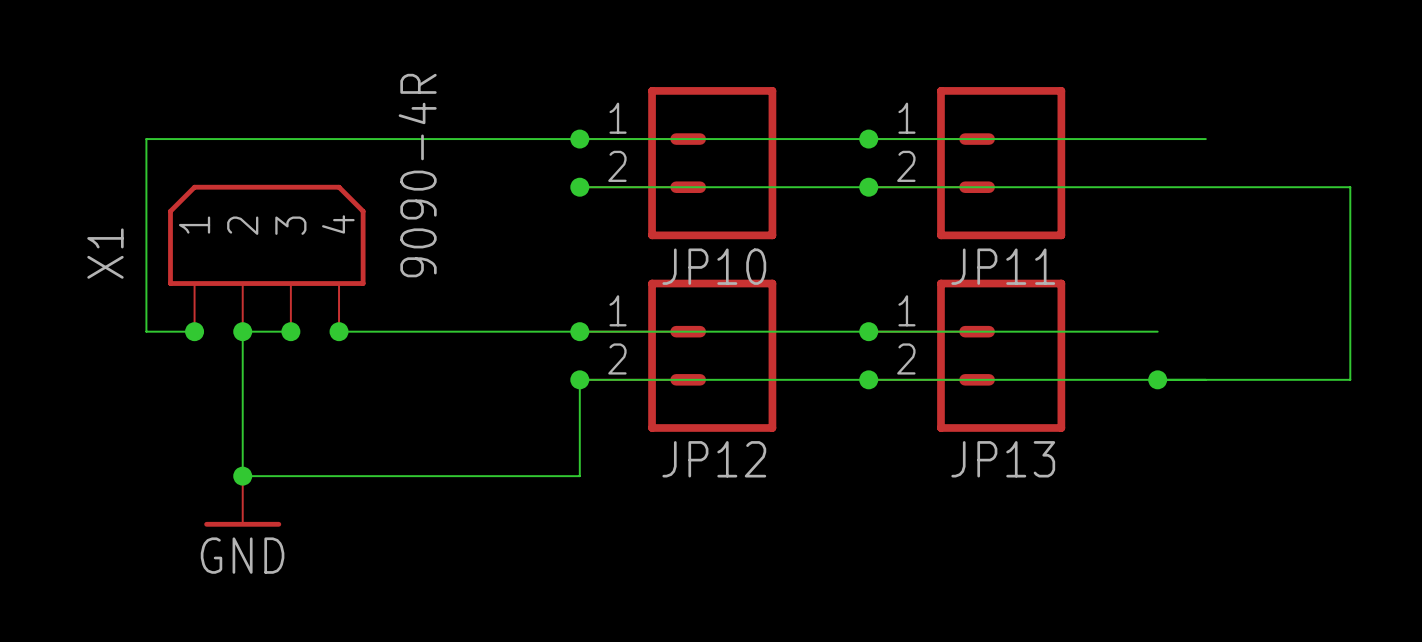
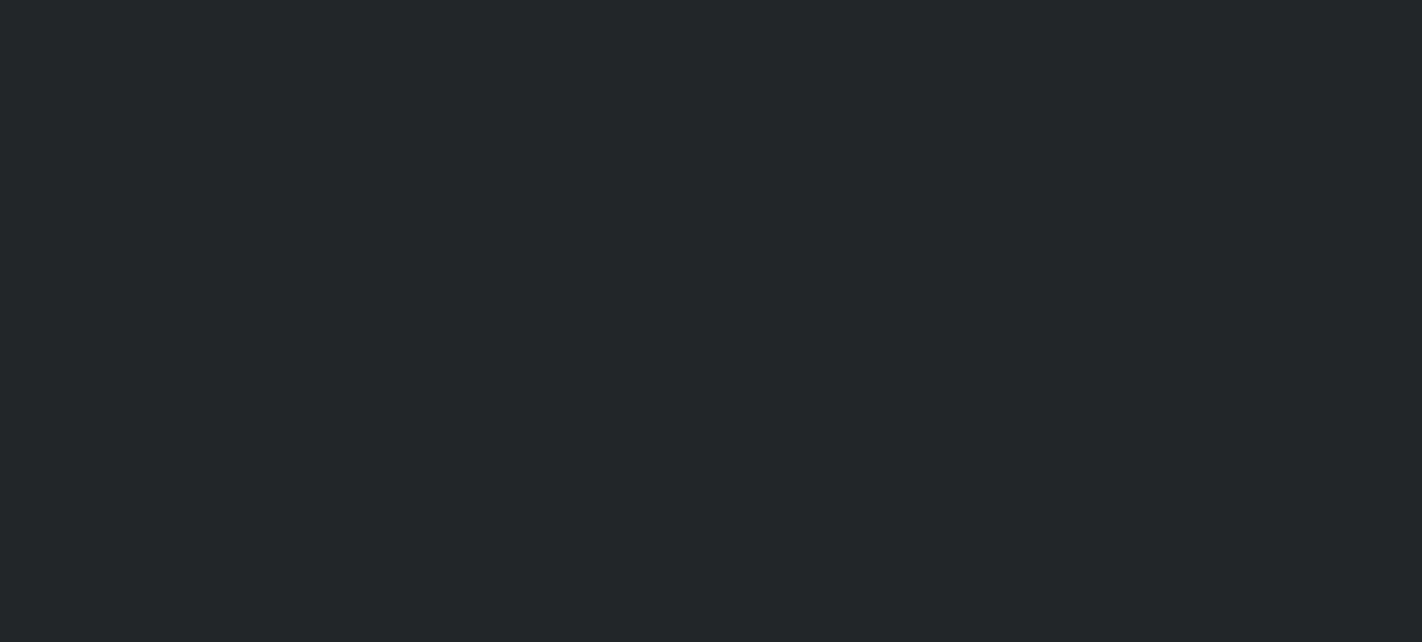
junction: (579, 139) -> none
junction: (868, 139) -> none
wire: (1205, 139) (146, 139) (146, 331) (194, 331) -> none
JP10: (678, 163) -> none
JP11: (966, 163) -> none
wire: (579, 187) (1350, 187) (1350, 379) (579, 379) (579, 476) (242, 476) (242, 331) (290, 331) -> none
junction: (579, 187) -> none
junction: (868, 187) -> none
X1: 9090-4R (266, 258) -> none
junction: (194, 331) -> none
junction: (242, 331) -> none
junction: (290, 331) -> none
wire: (339, 331) (1157, 331) -> none
junction: (339, 331) -> none
junction: (579, 331) -> none
junction: (868, 331) -> none
JP12: (678, 355) -> none
JP13: (966, 355) -> none
junction: (579, 379) -> none
junction: (868, 379) -> none
junction: (1157, 379) -> none
junction: (242, 476) -> none
power symbol: GND (242, 501) -> none

